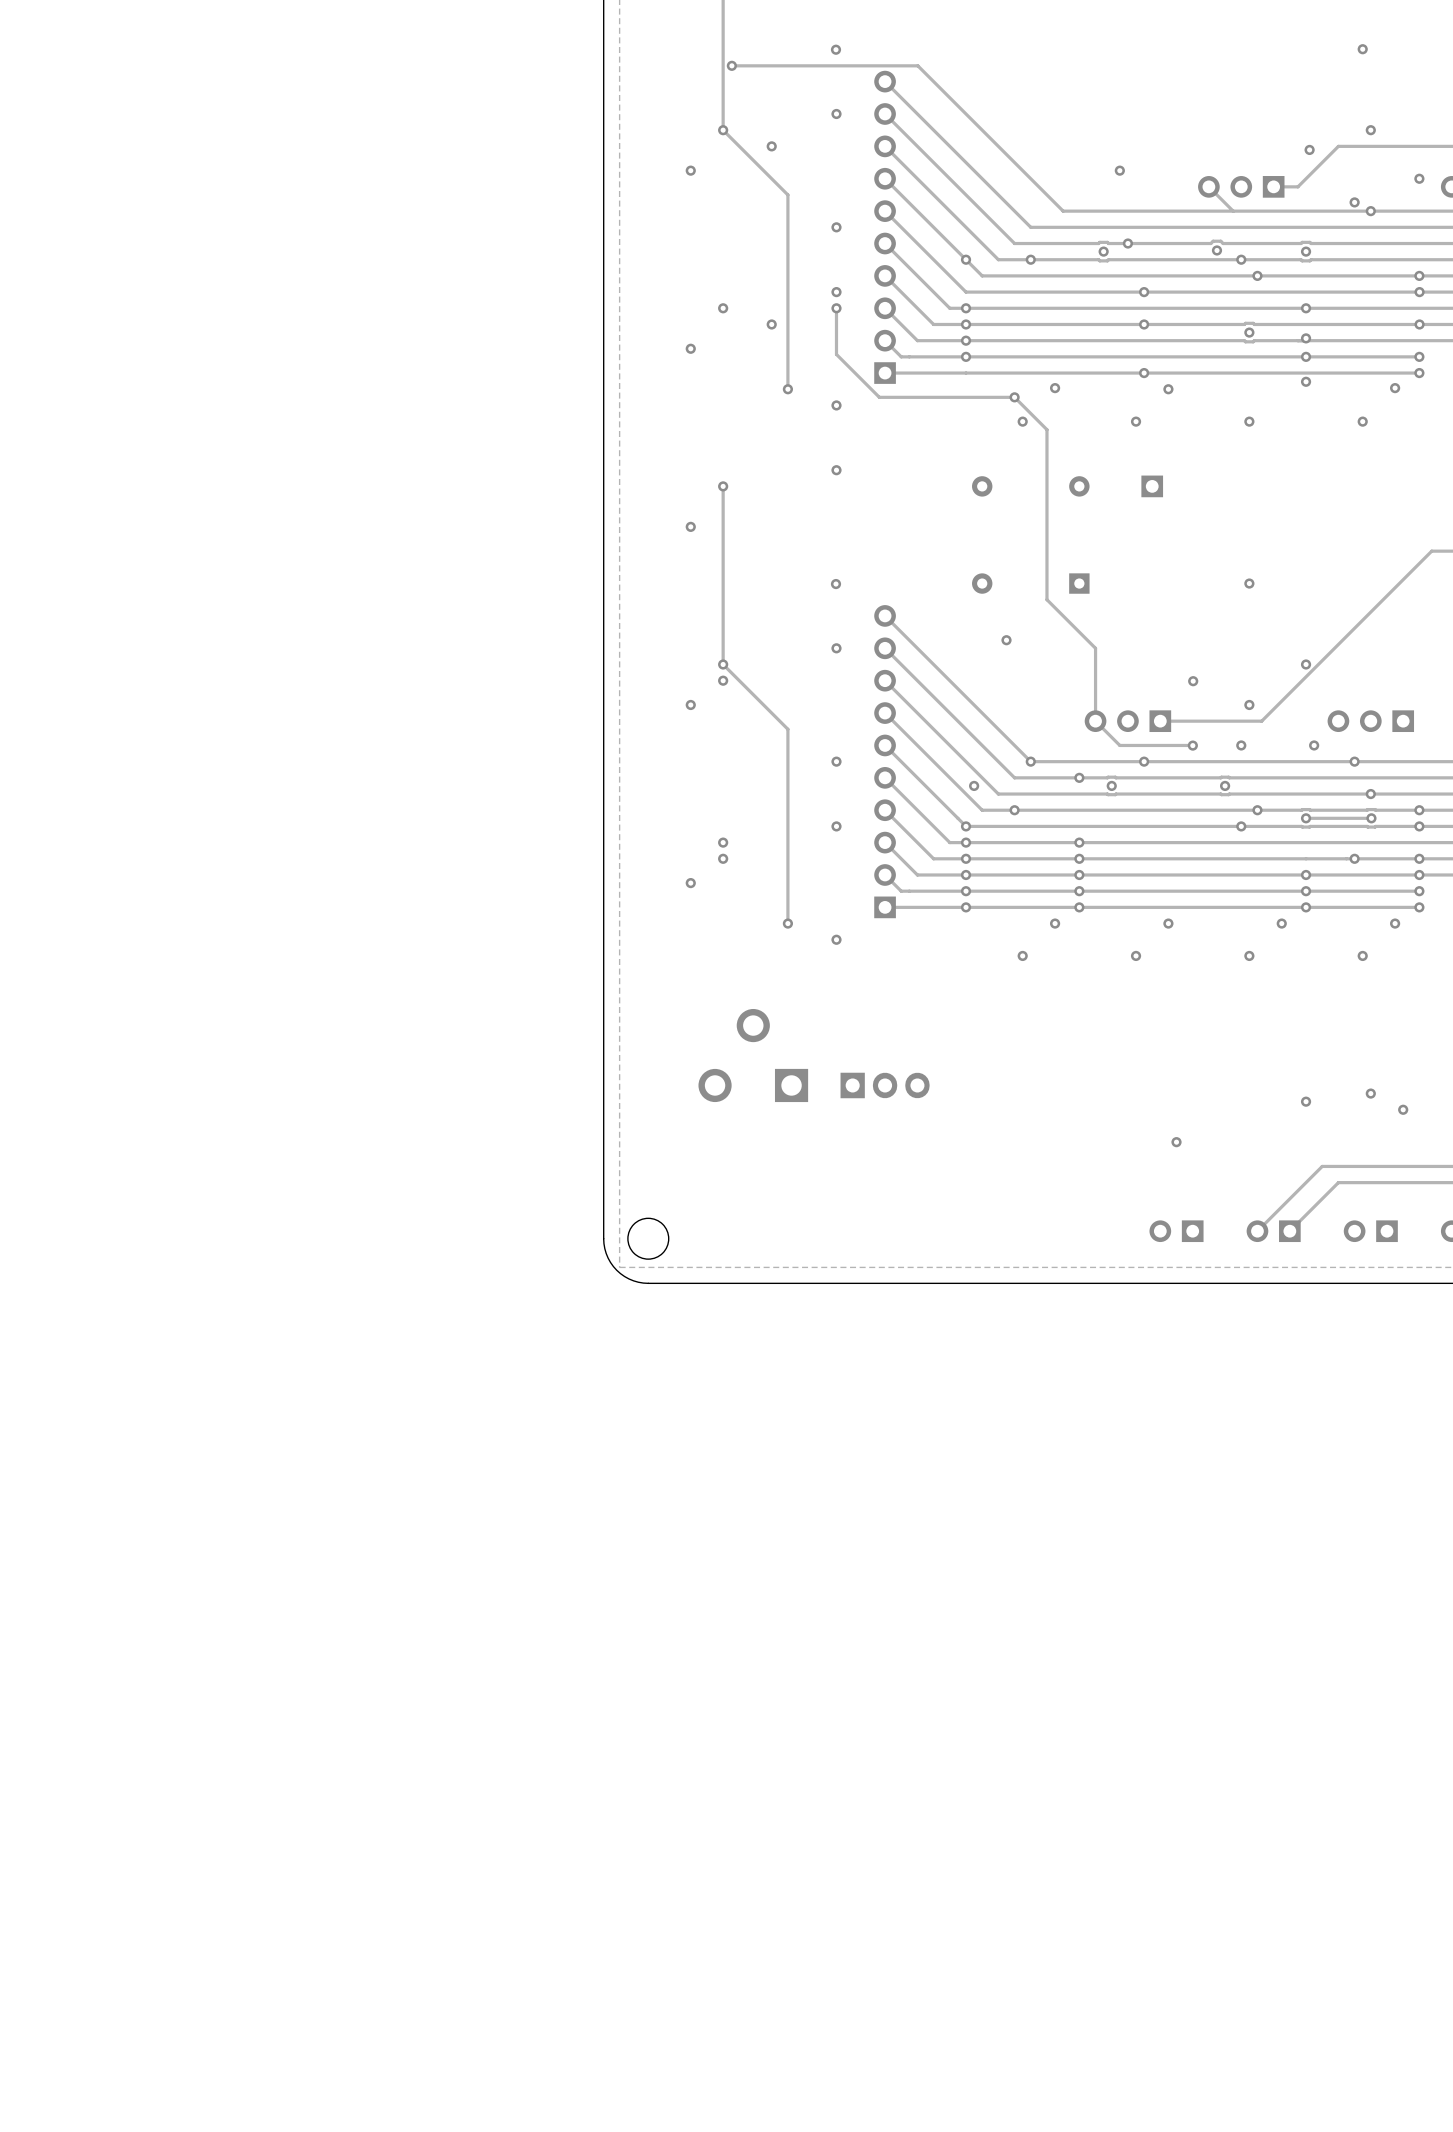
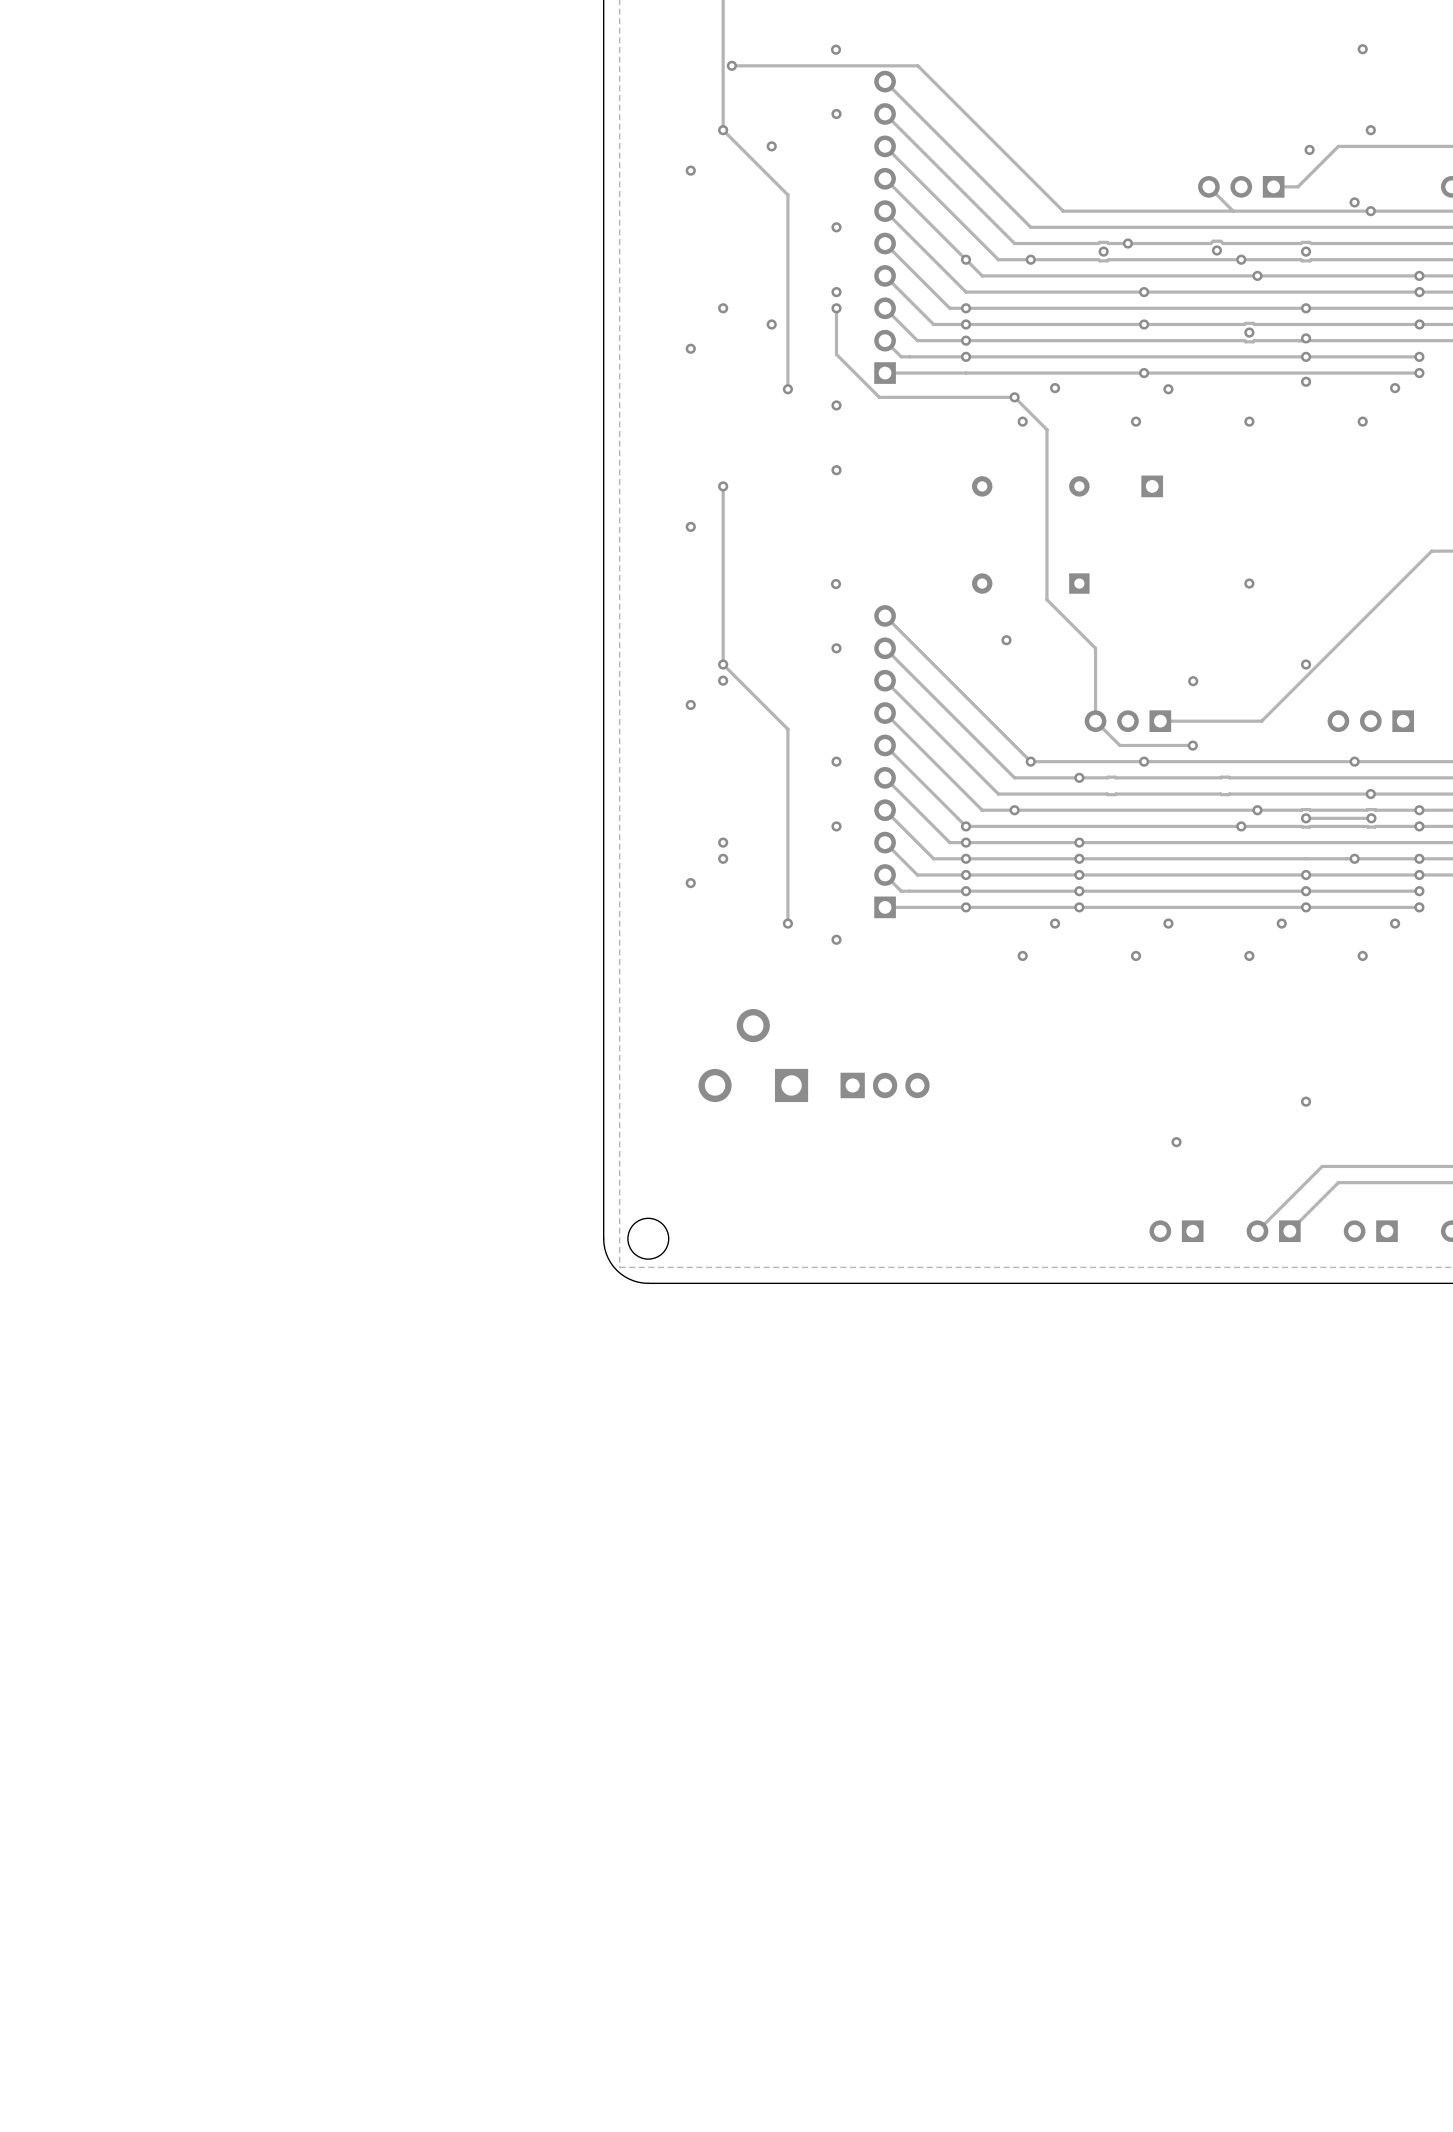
via: (1119, 170) -> none
via: (1419, 178) -> none
via: (1249, 704) -> none
via: (1241, 745) -> none
via: (1314, 745) -> none
via: (974, 785) -> none
via: (1111, 785) -> none
via: (1225, 785) -> none
via: (1370, 1093) -> none
via: (1403, 1109) -> none

